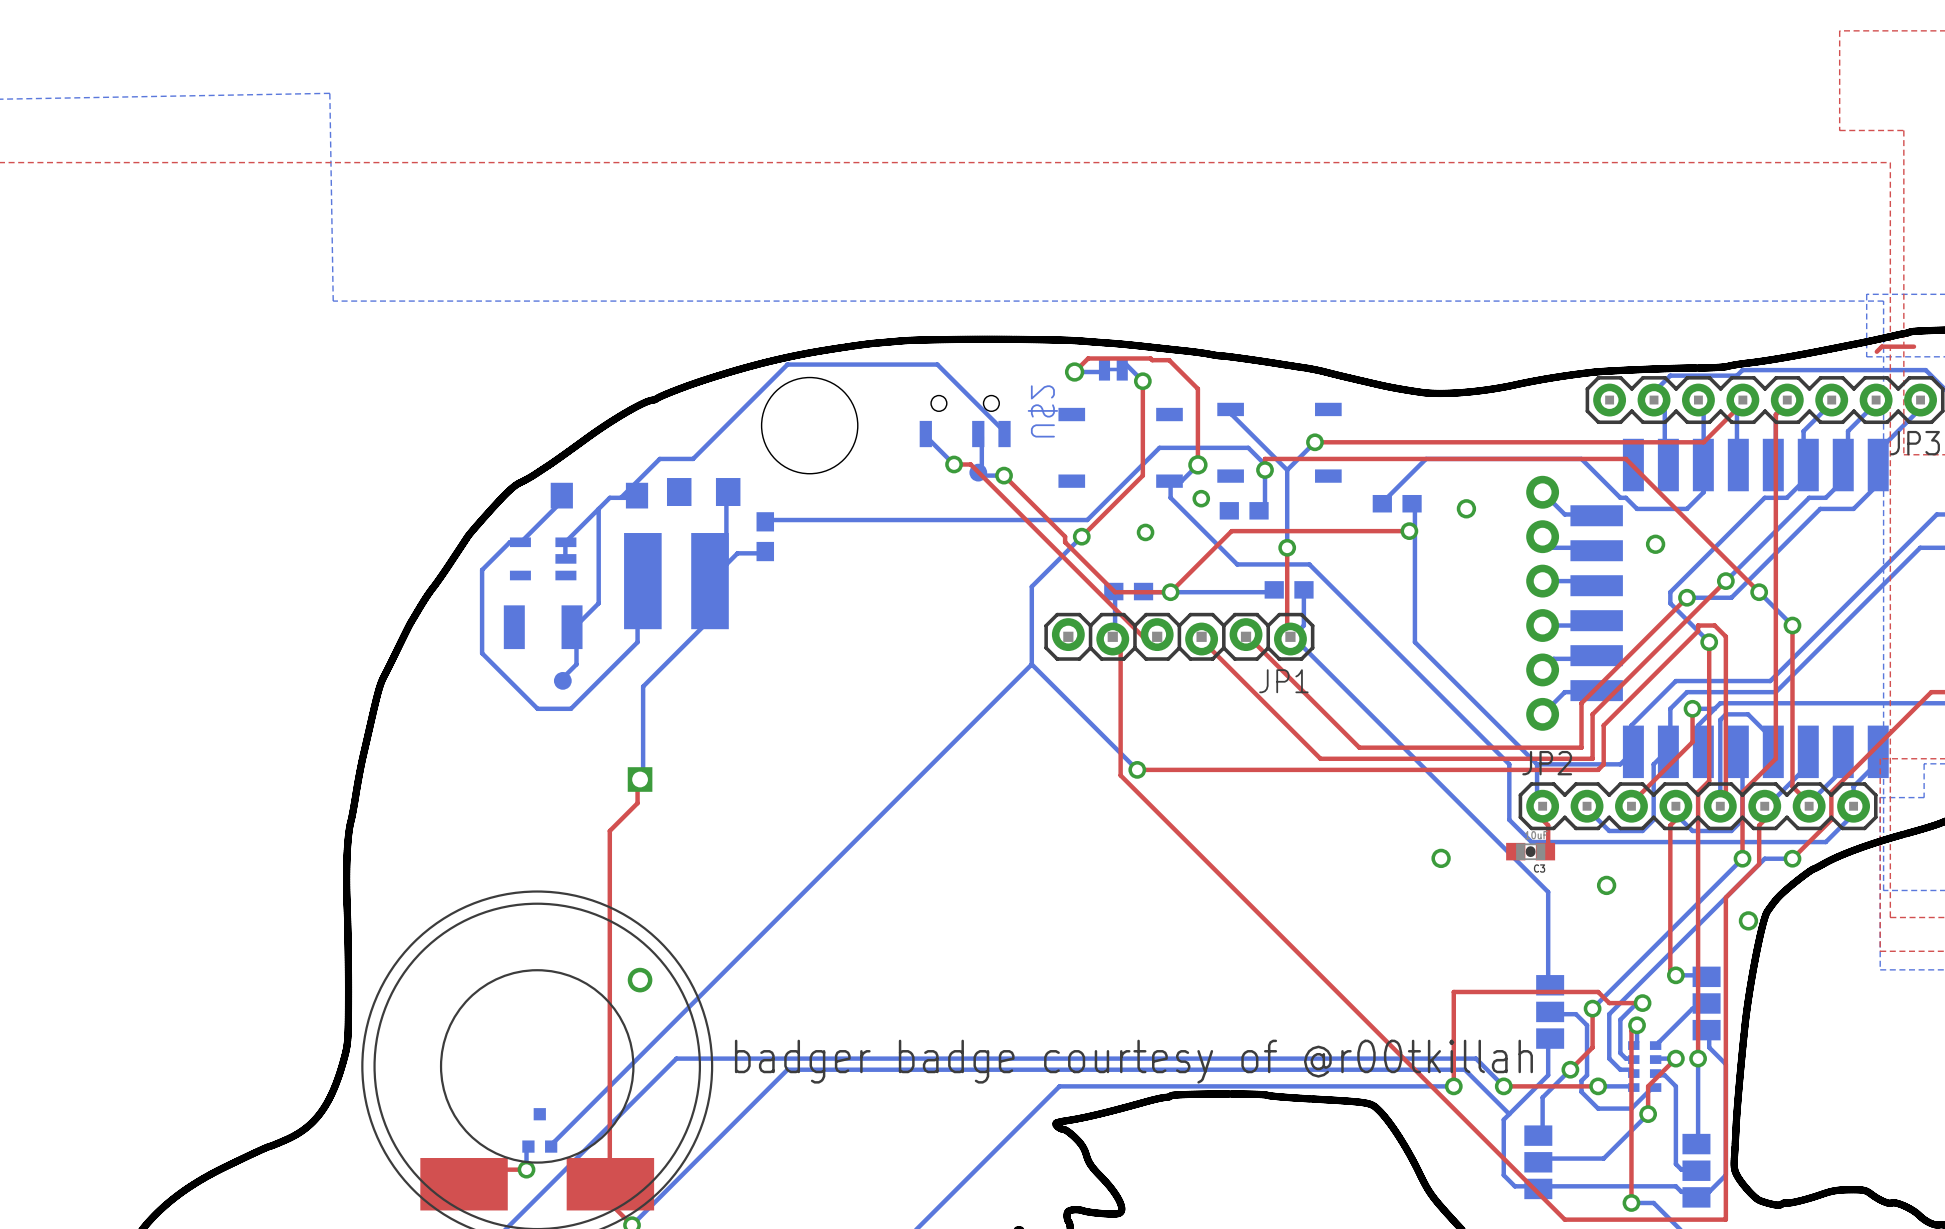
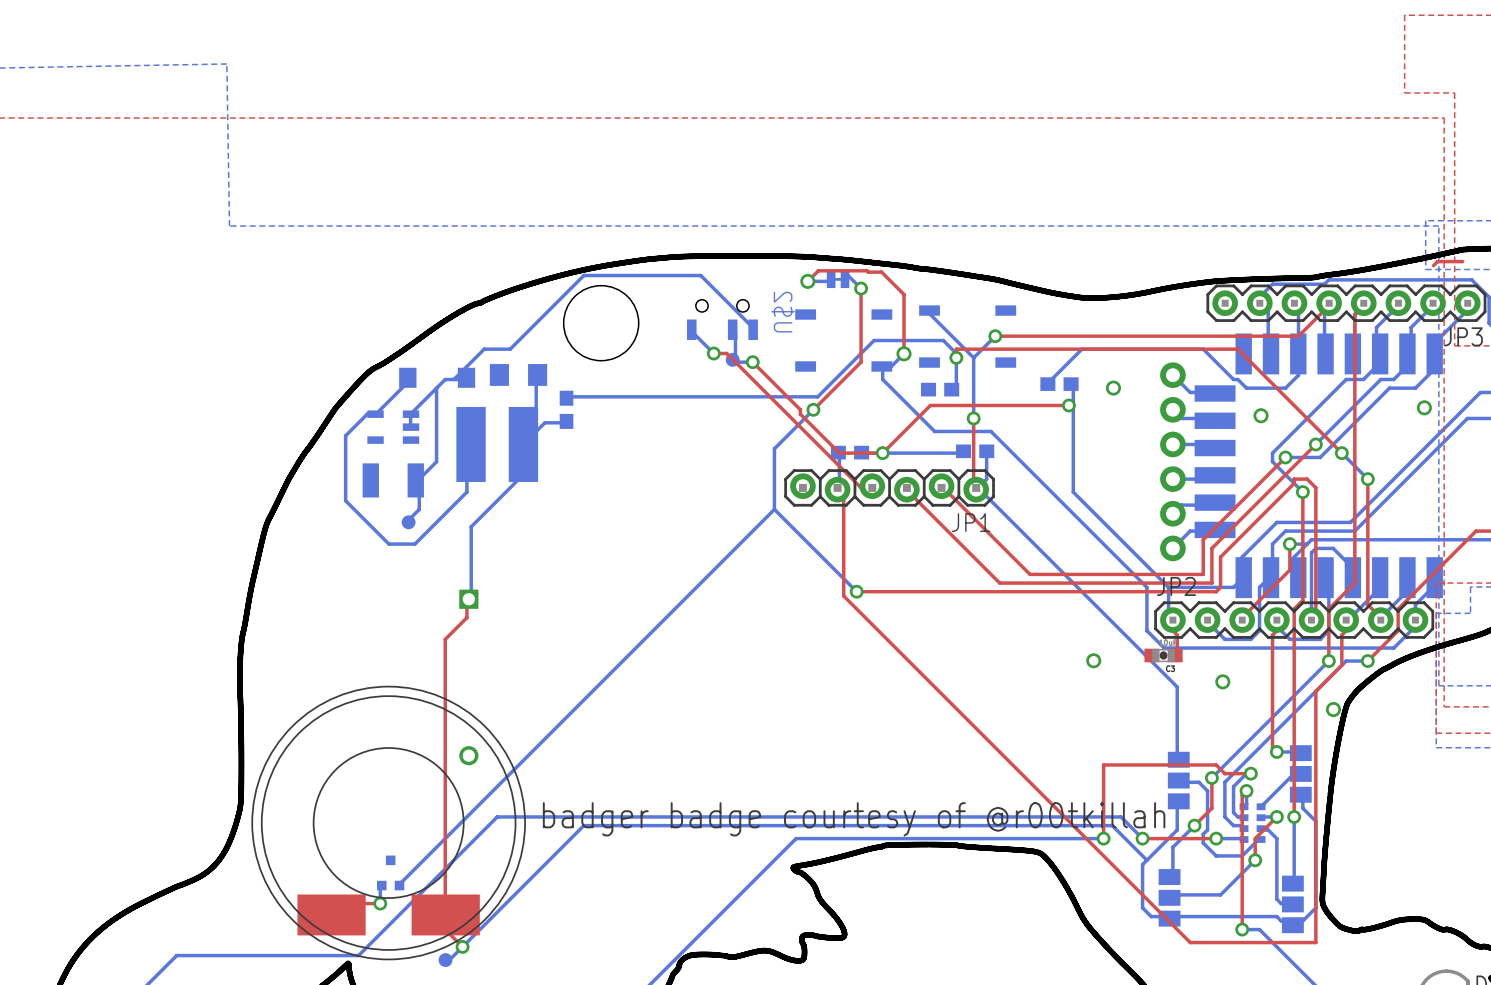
via: (1201, 498) -> none
via: (1145, 532) -> none
via: none -> (1424, 407)

